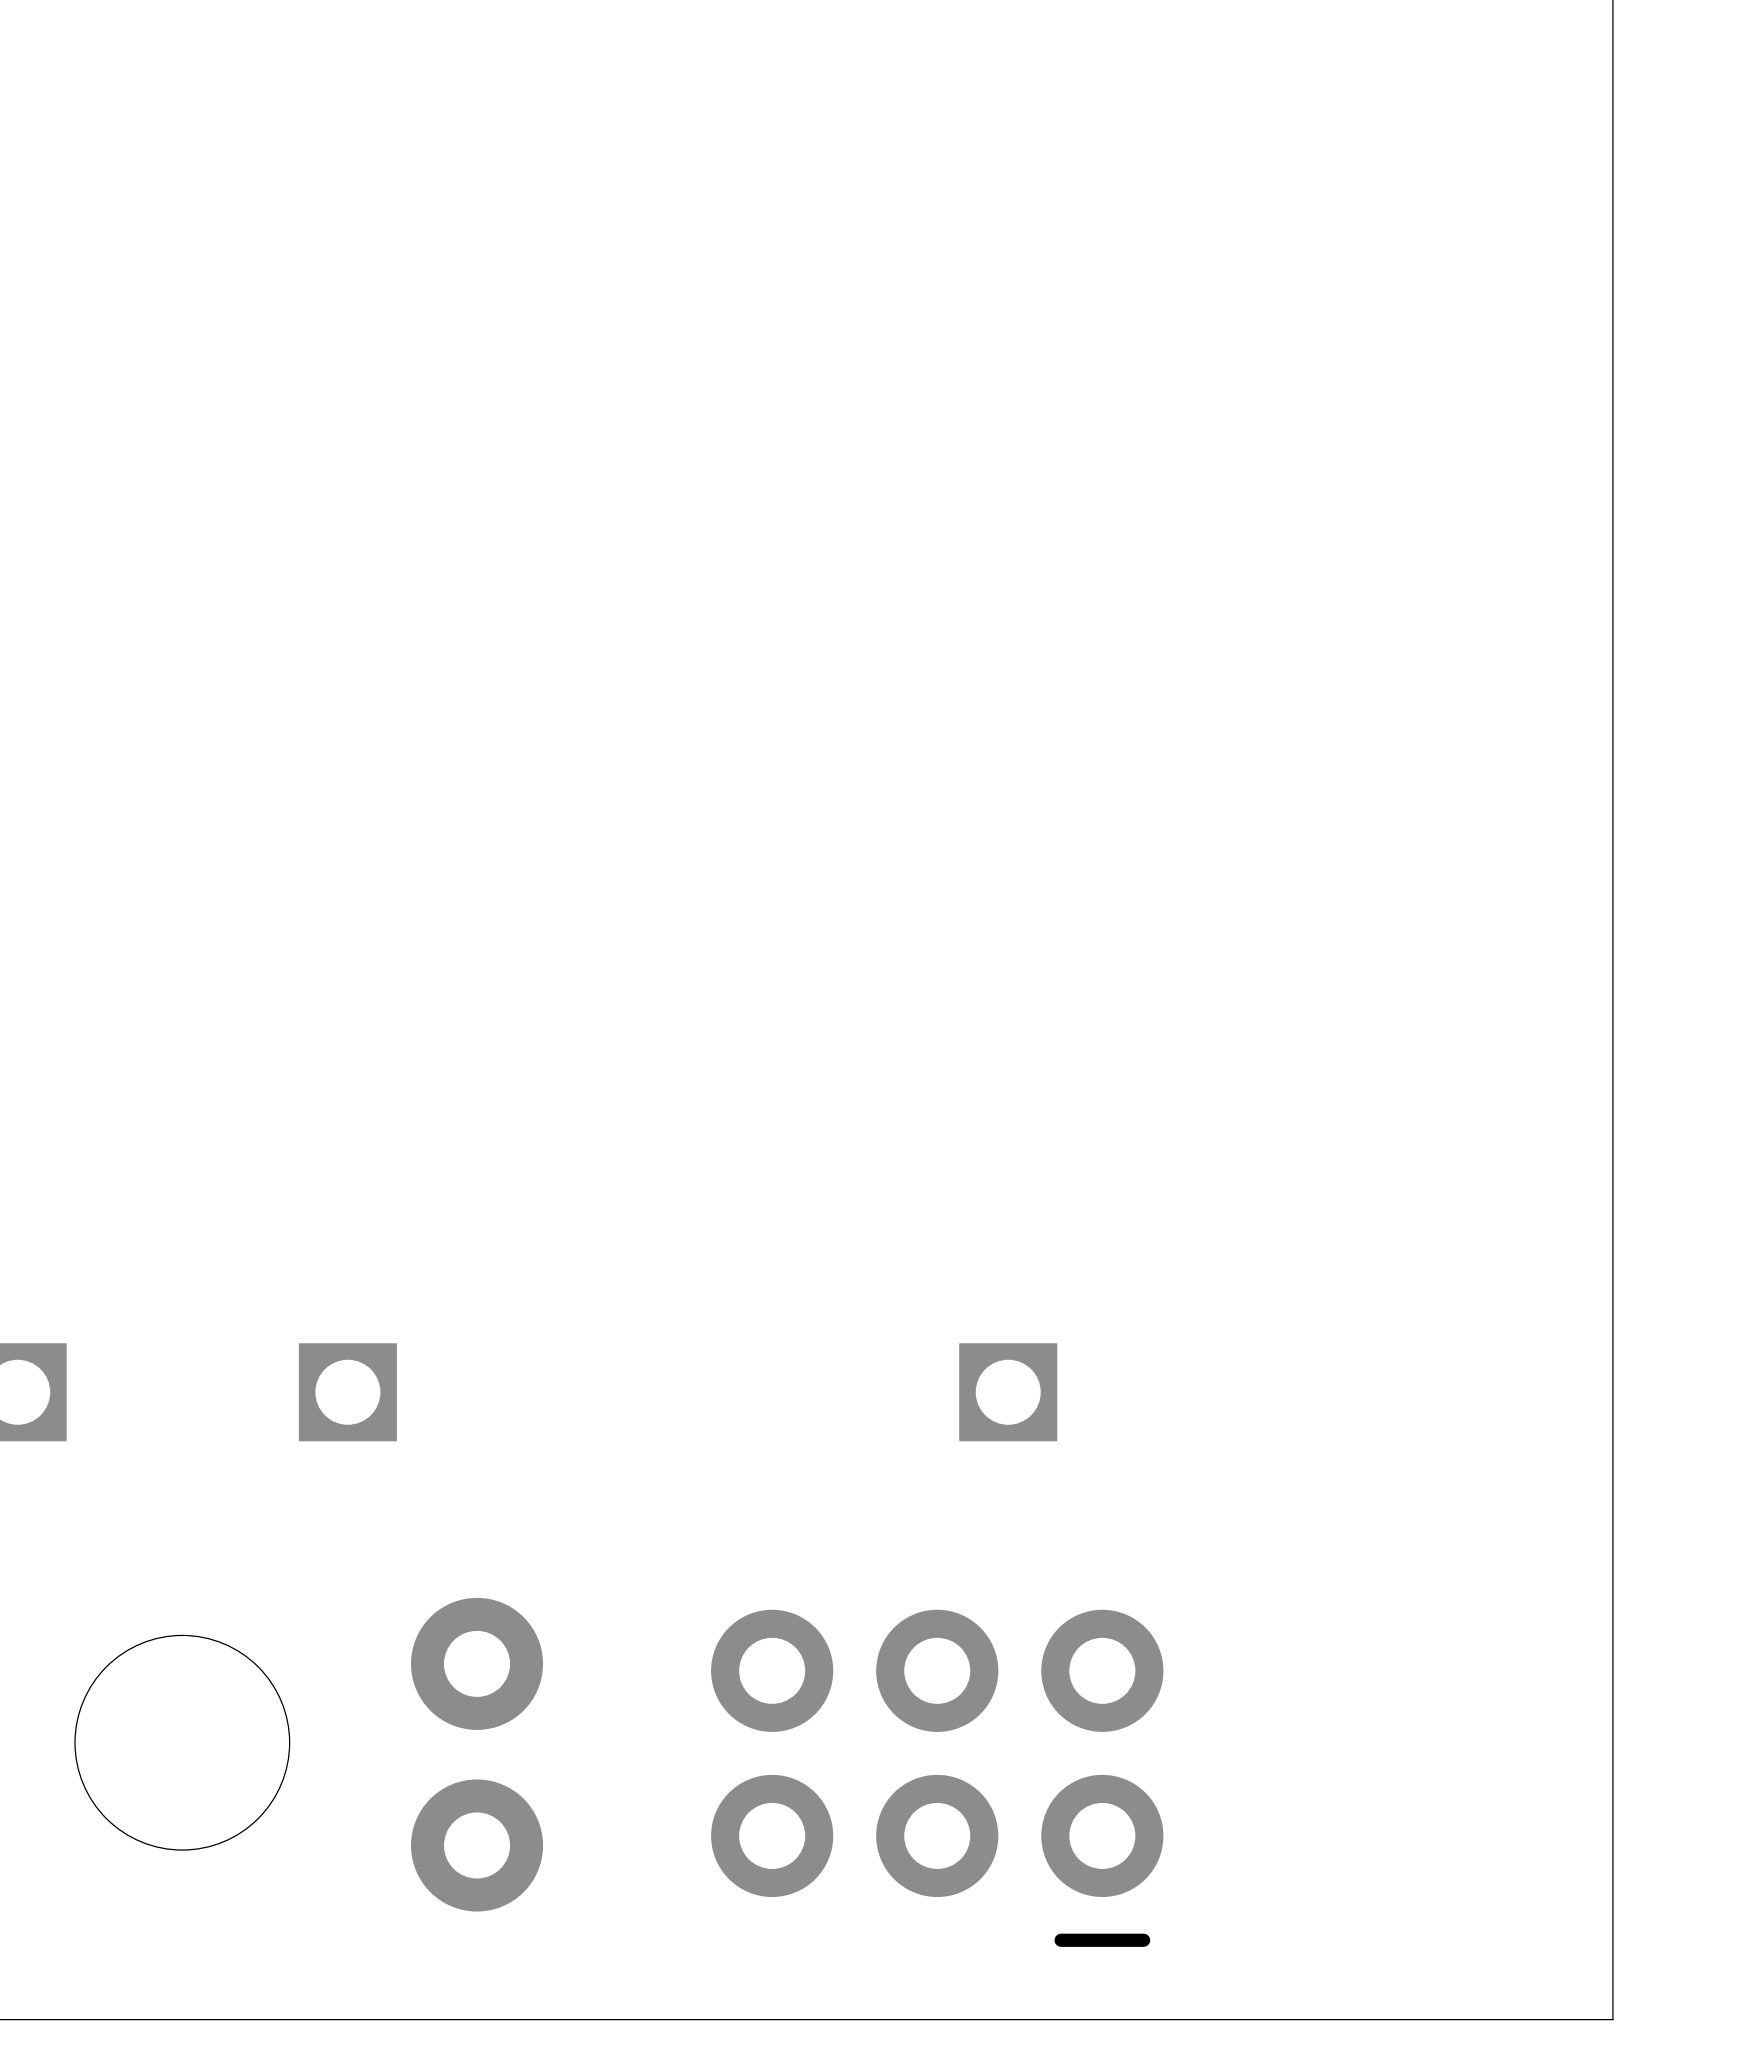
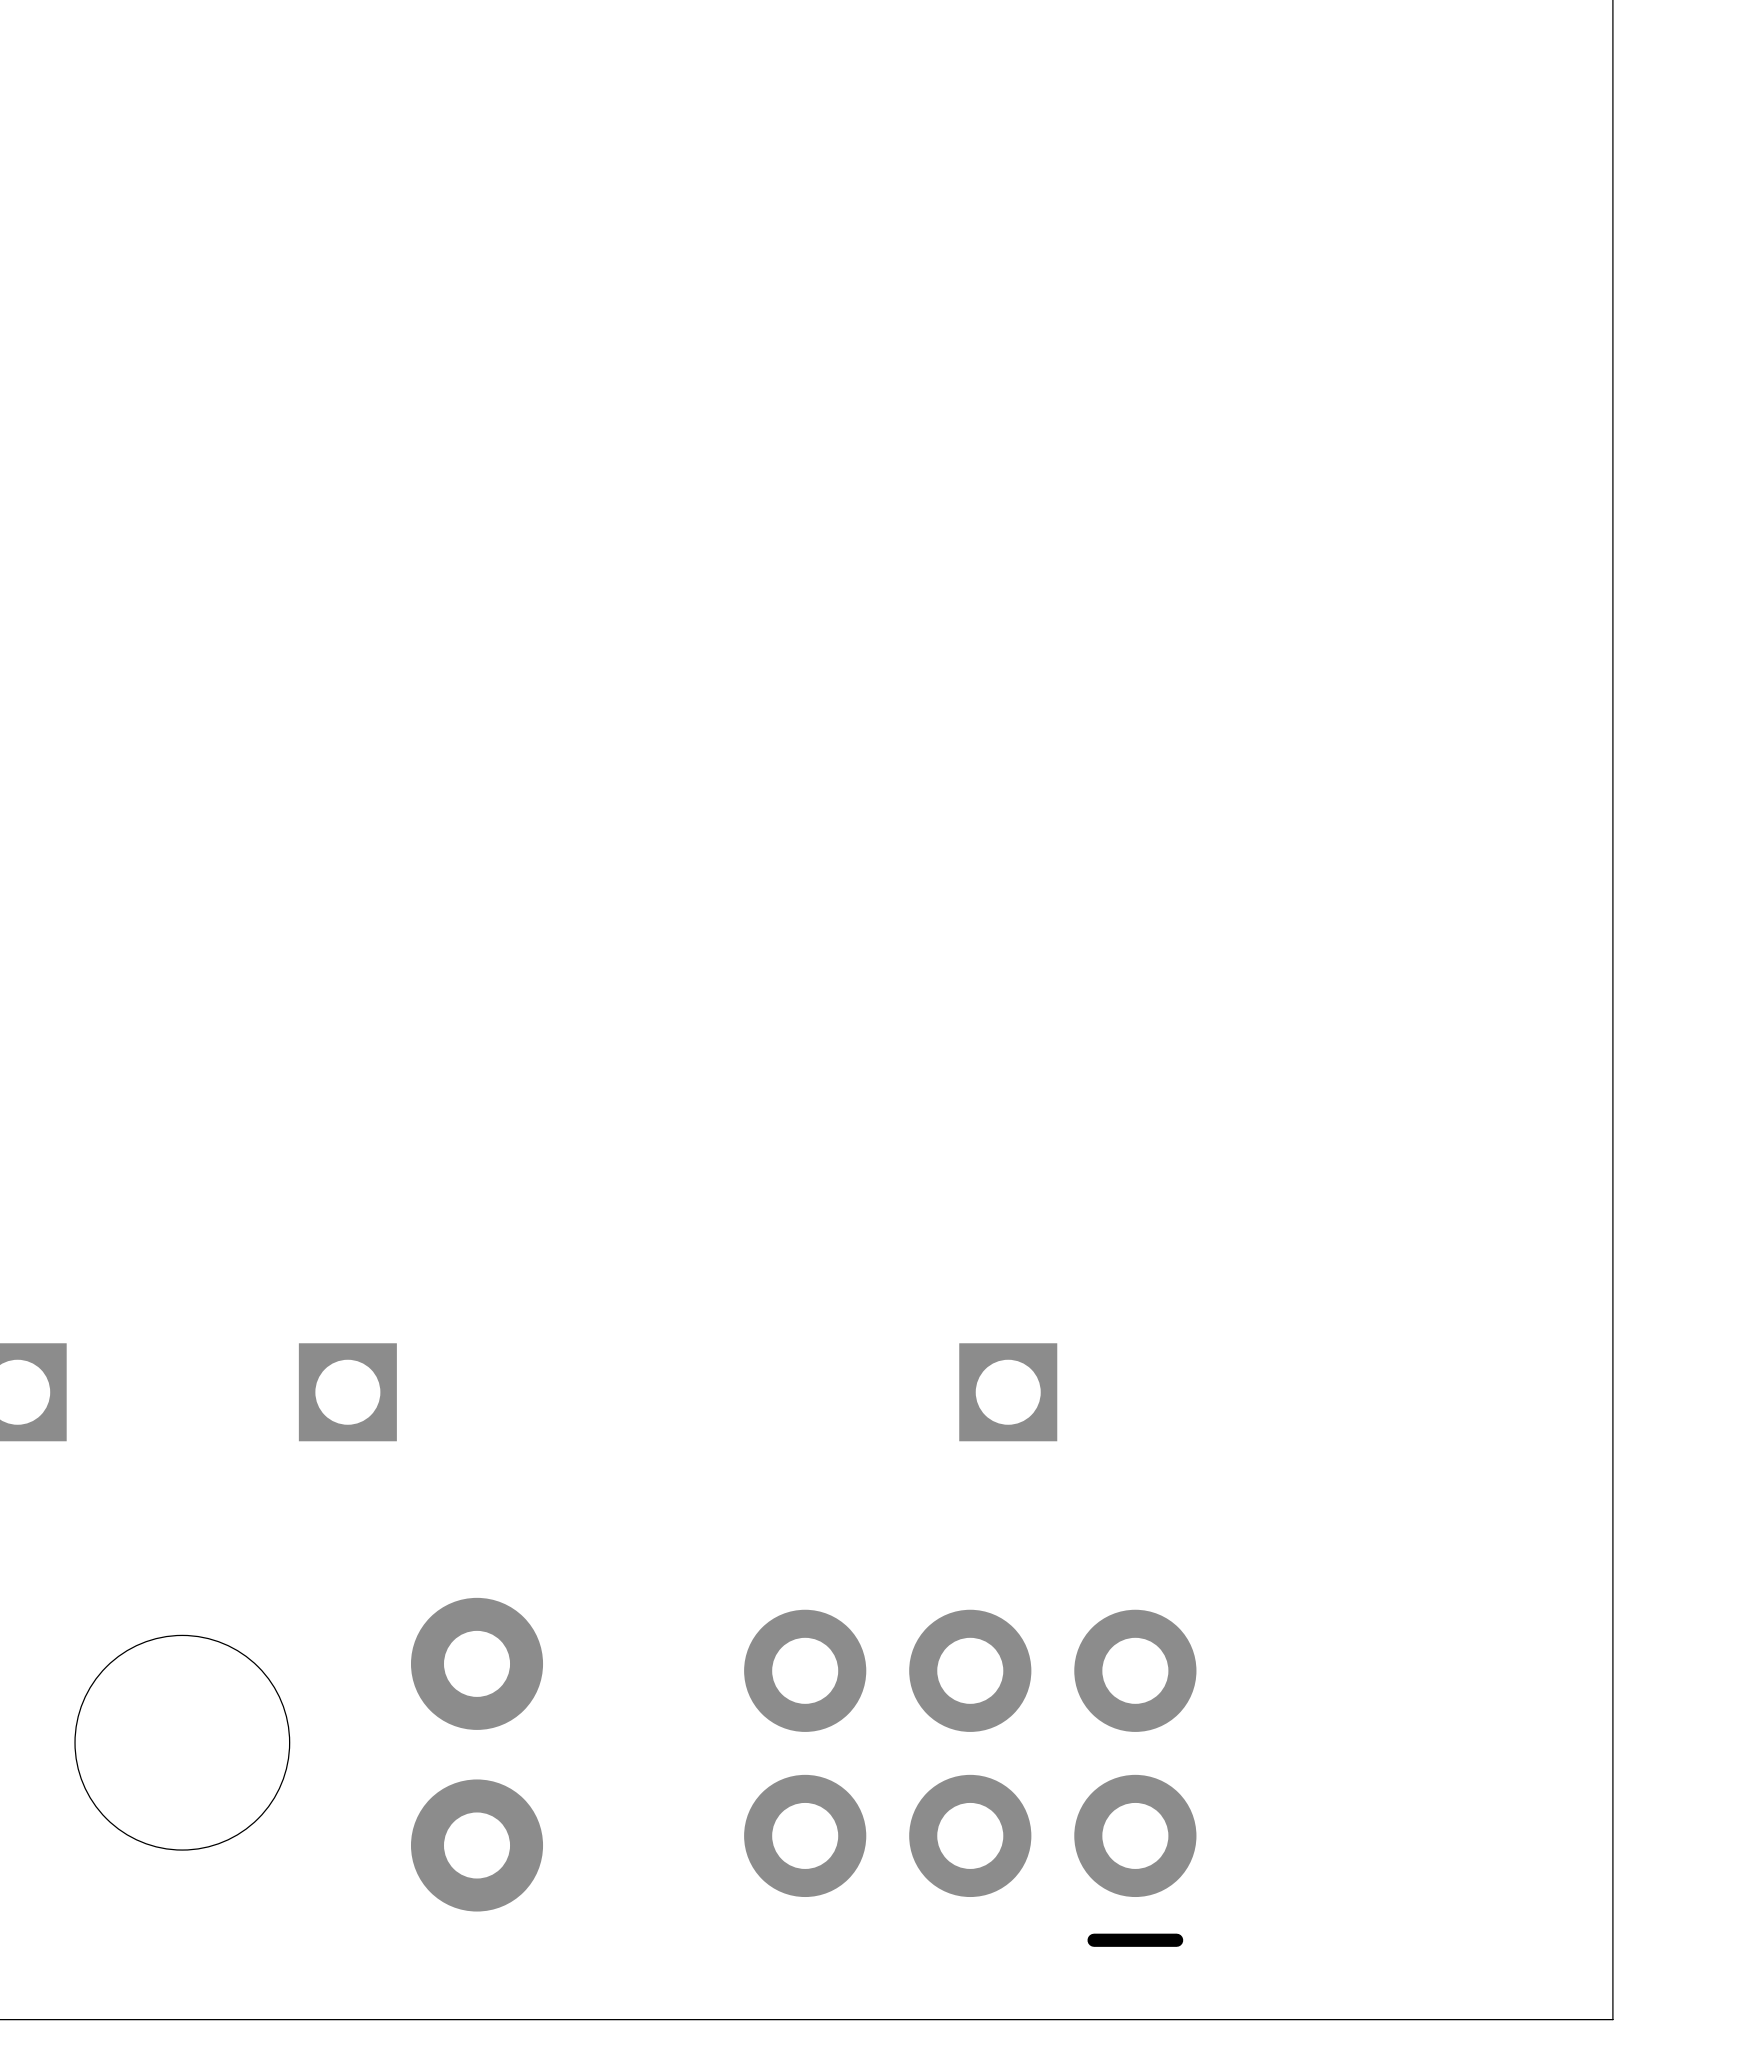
part position: (937, 1778) -> (970, 1778)

